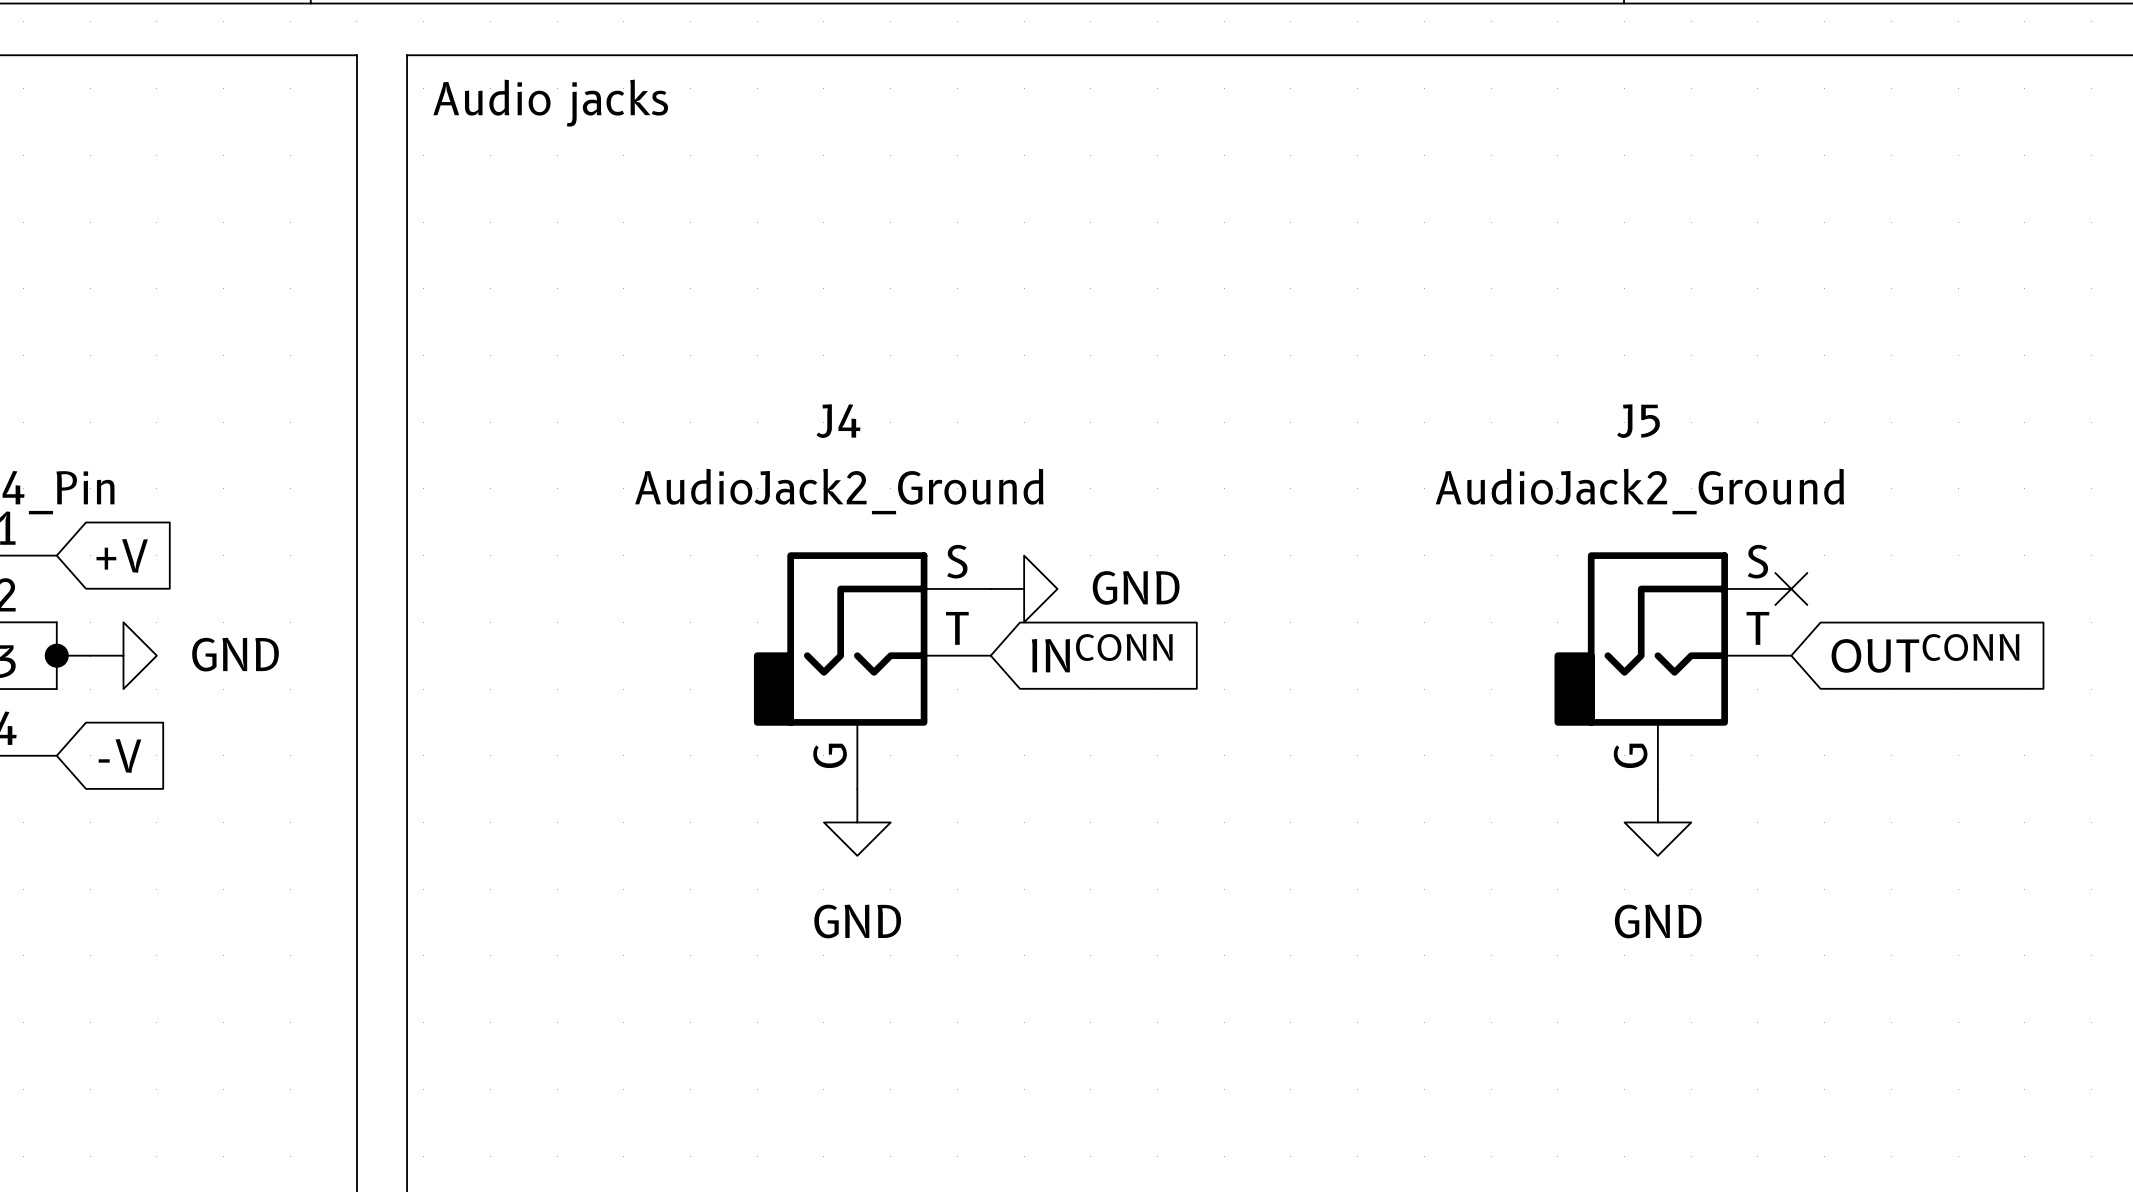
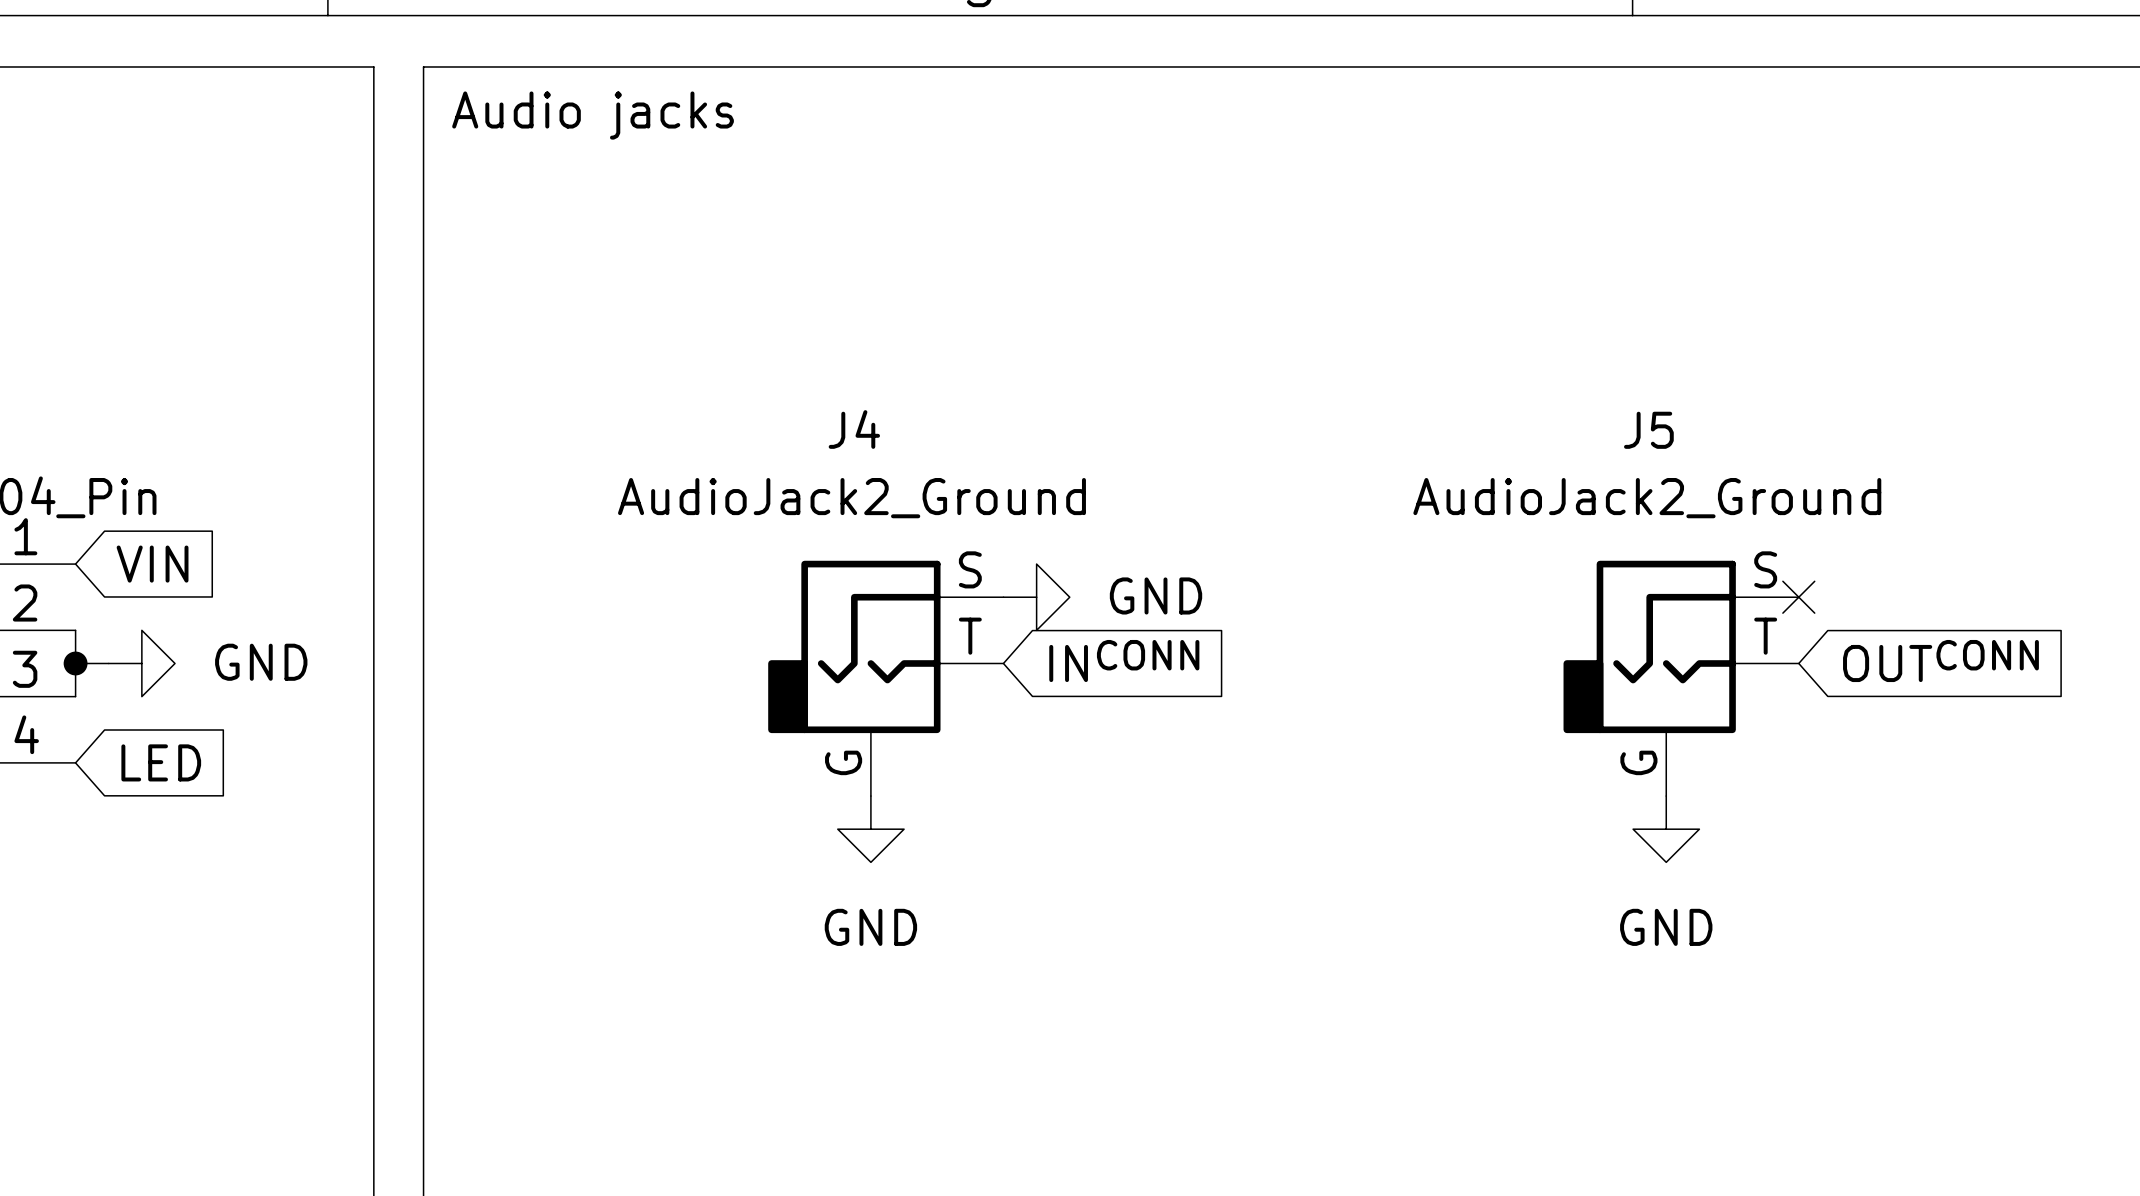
global label: +V (122, 555) -> VIN (152, 564)
global label: -V (119, 755) -> LED (161, 762)

